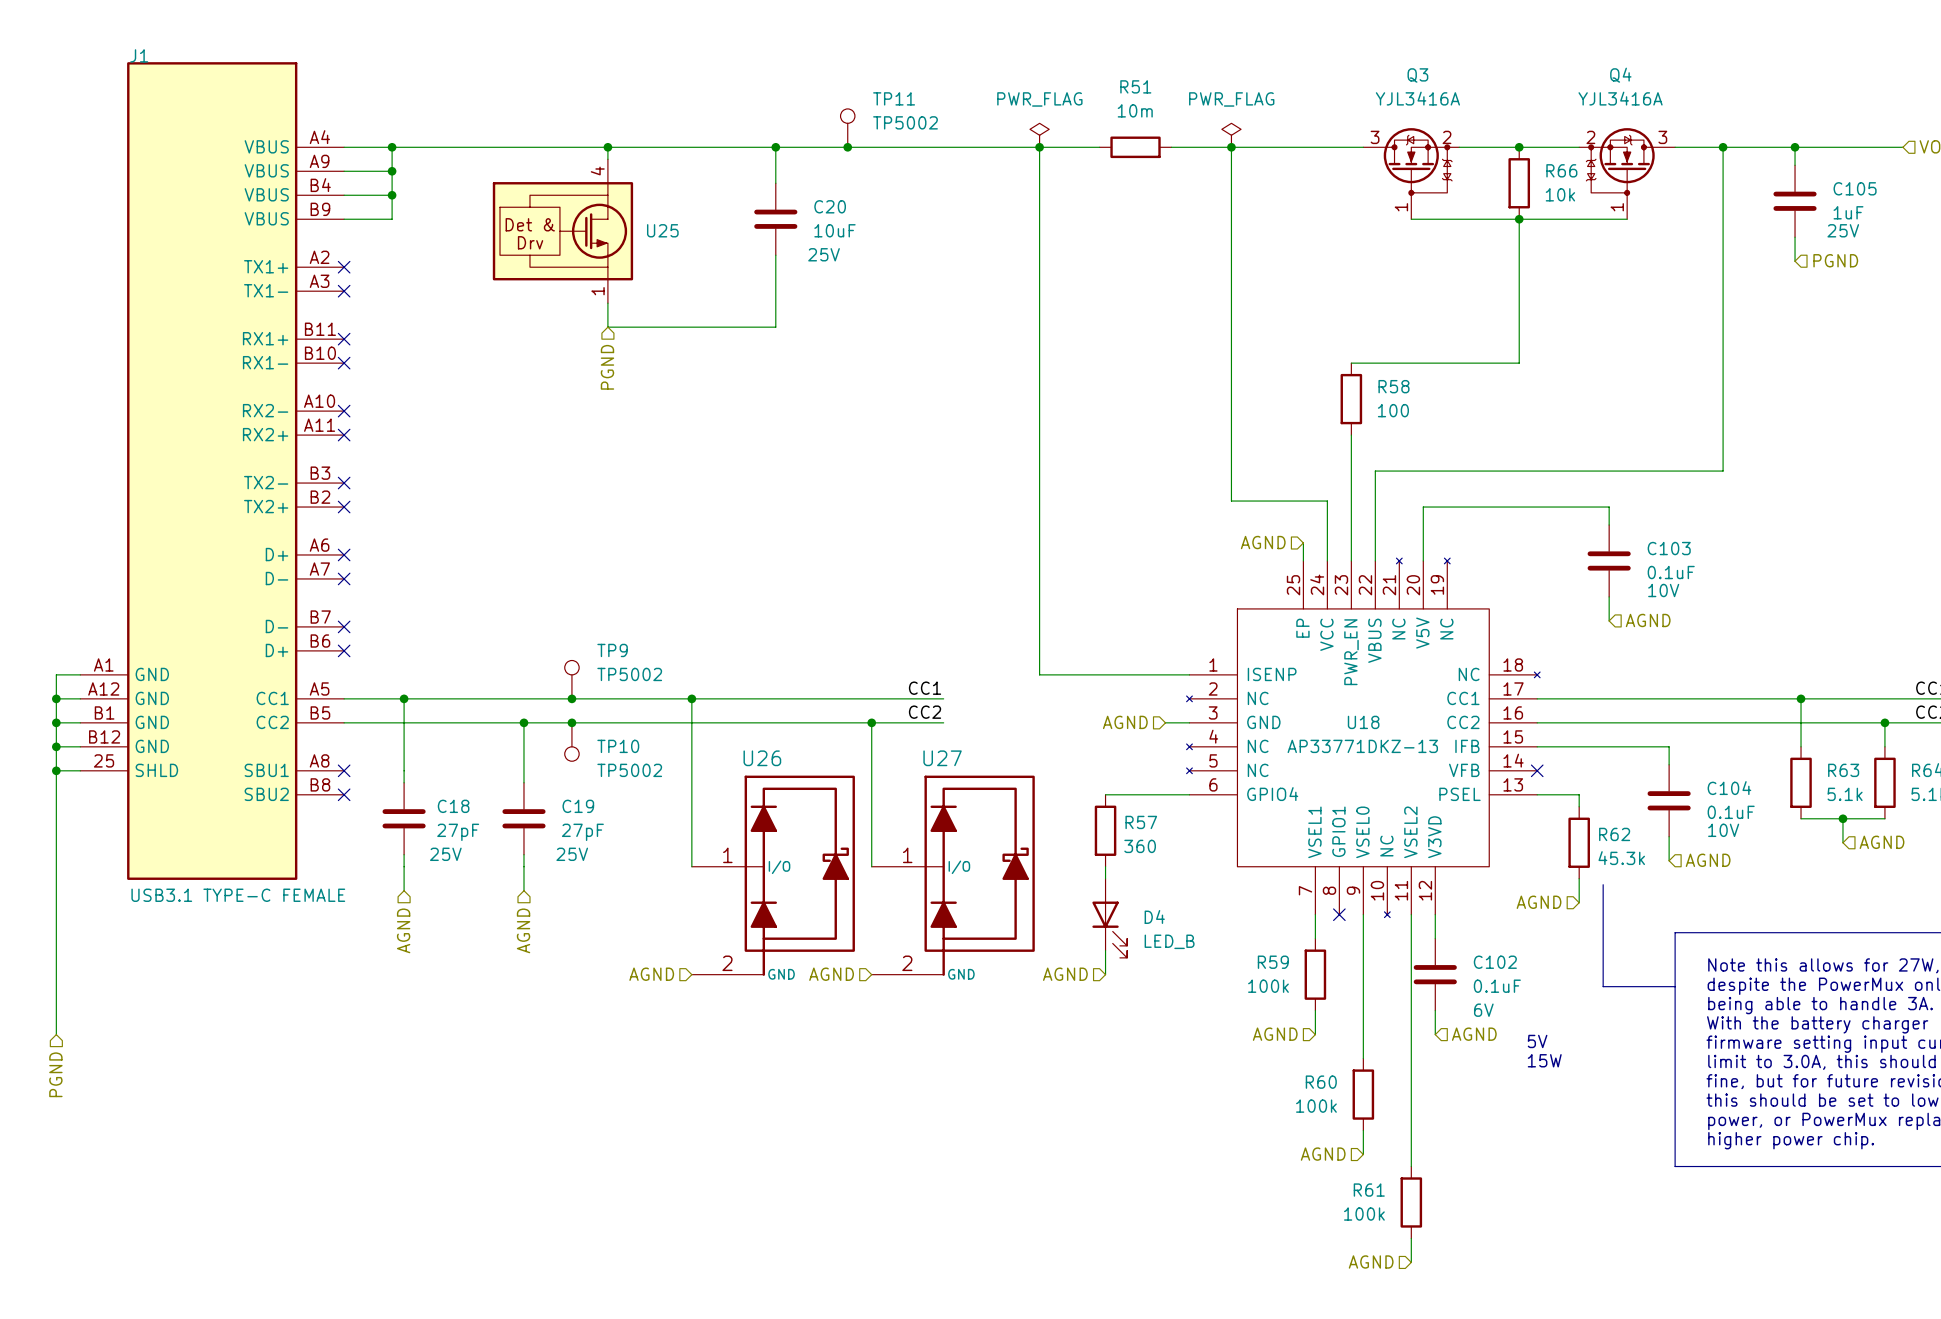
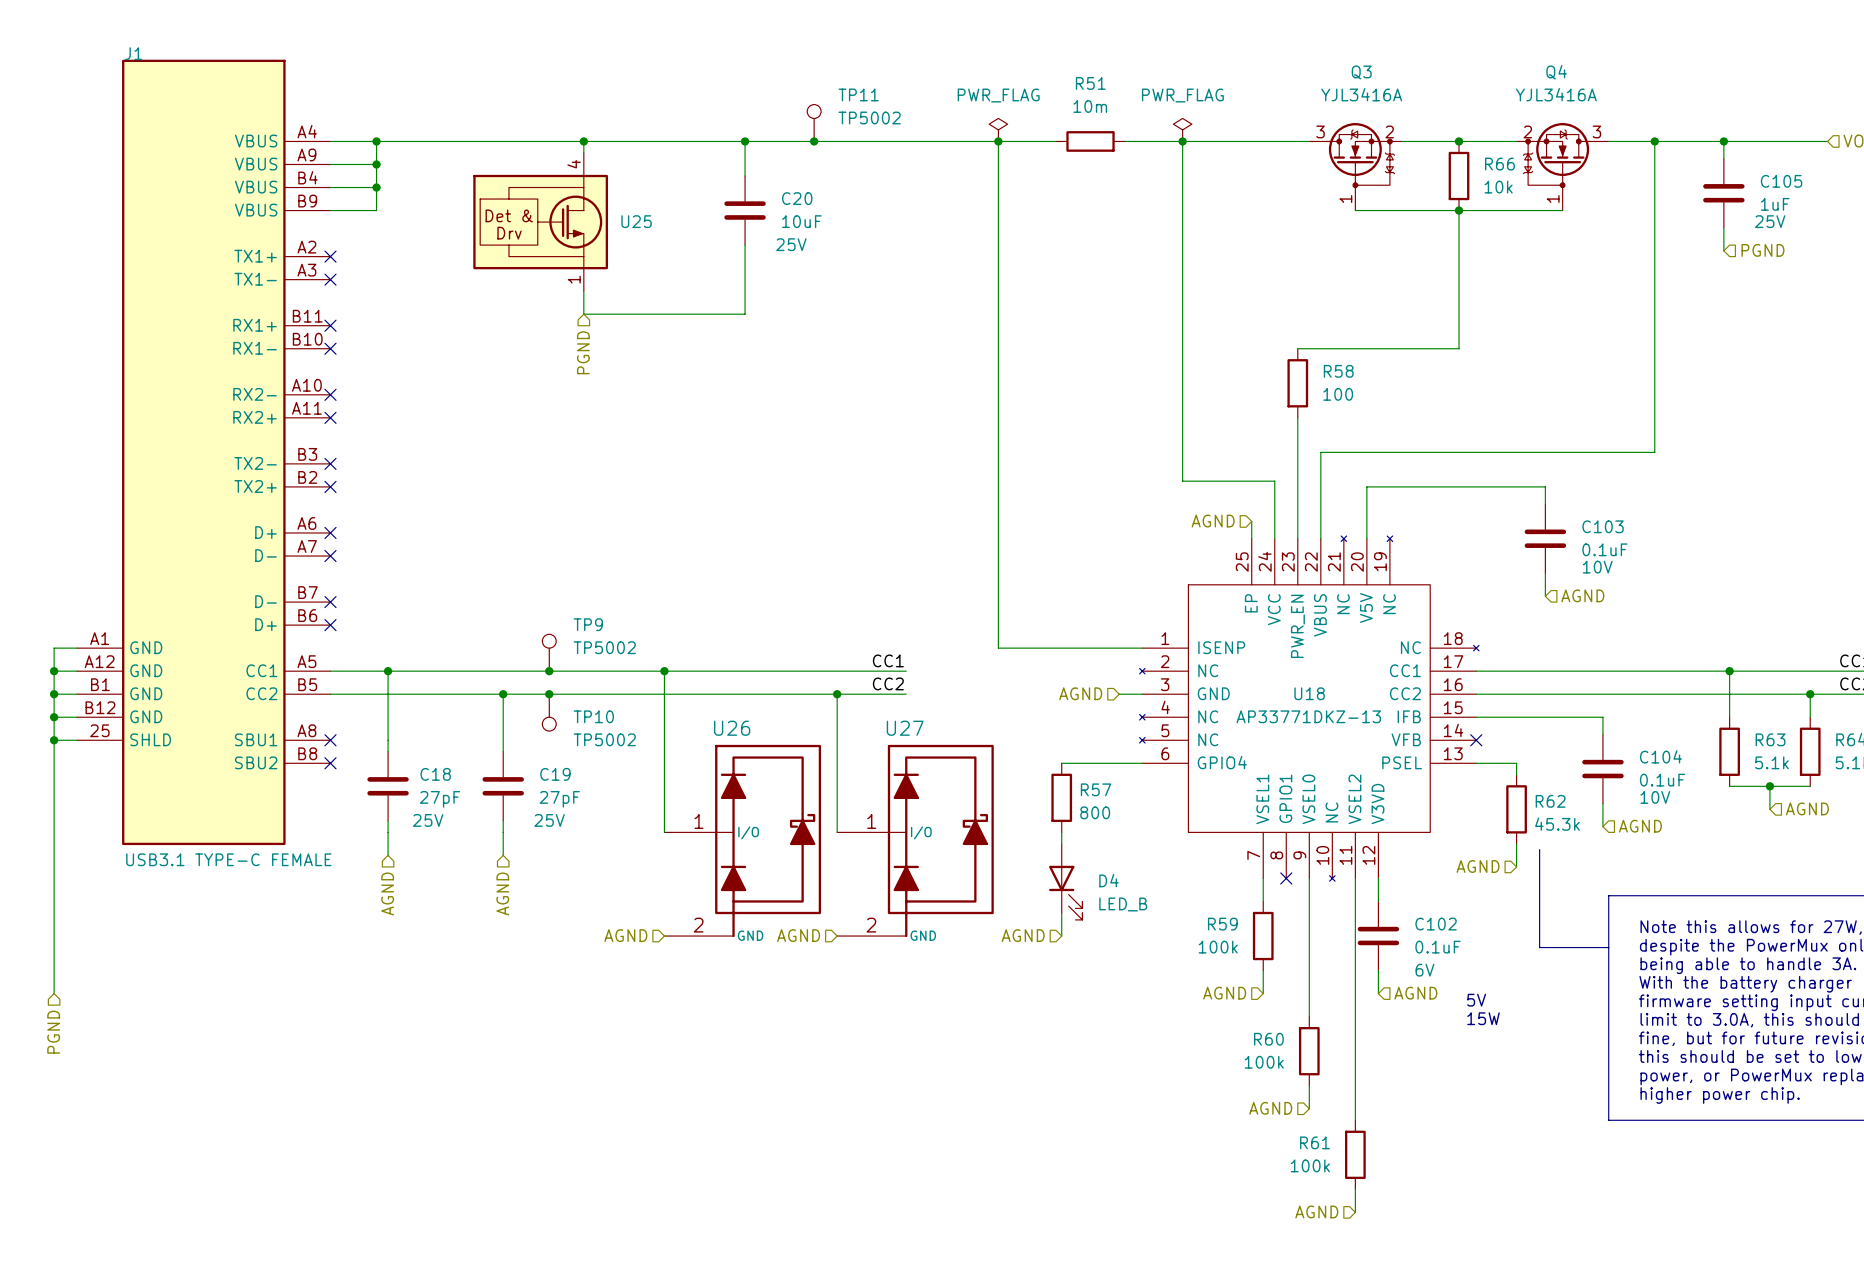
R57 value: 360 (1140, 846) -> 800 (1095, 812)

